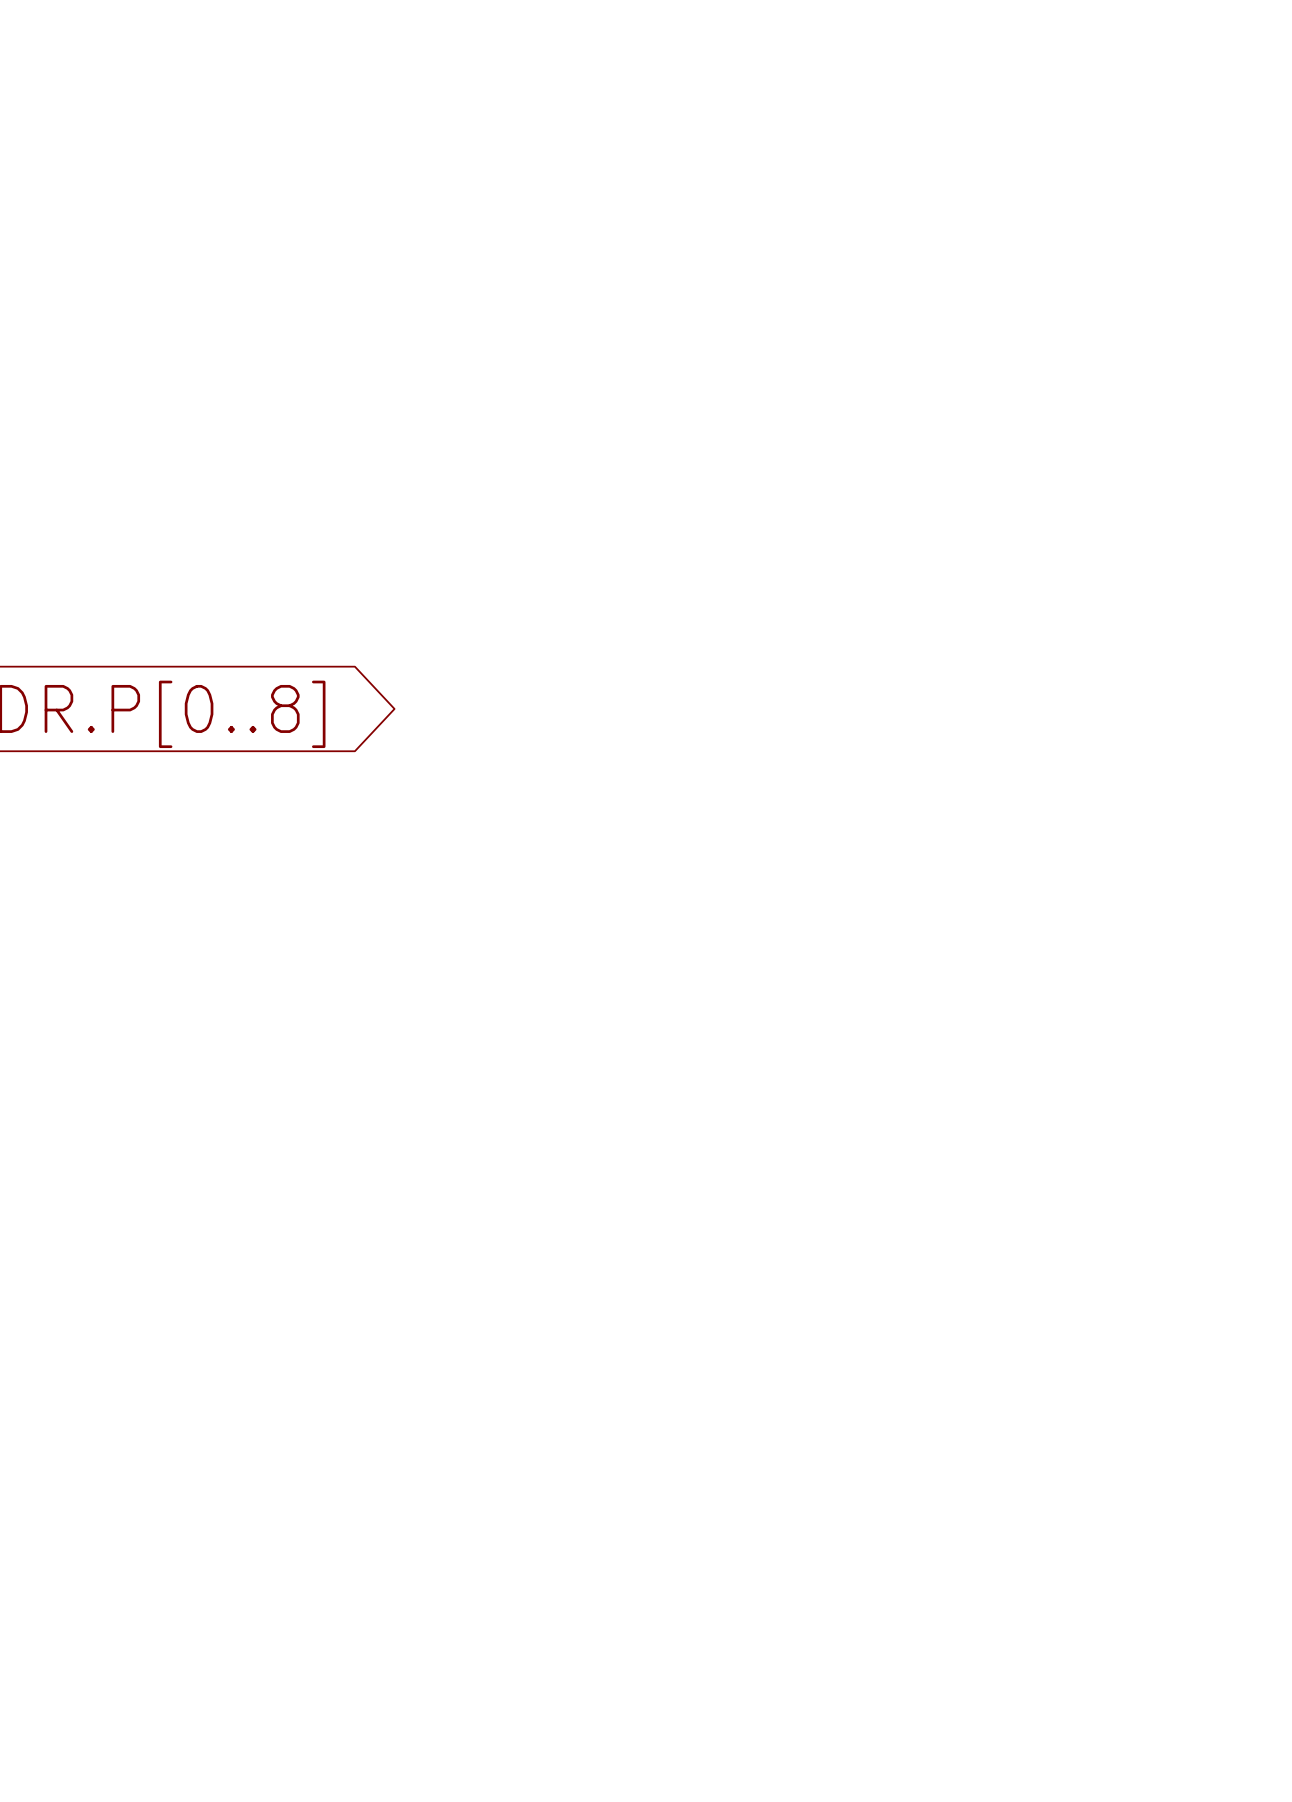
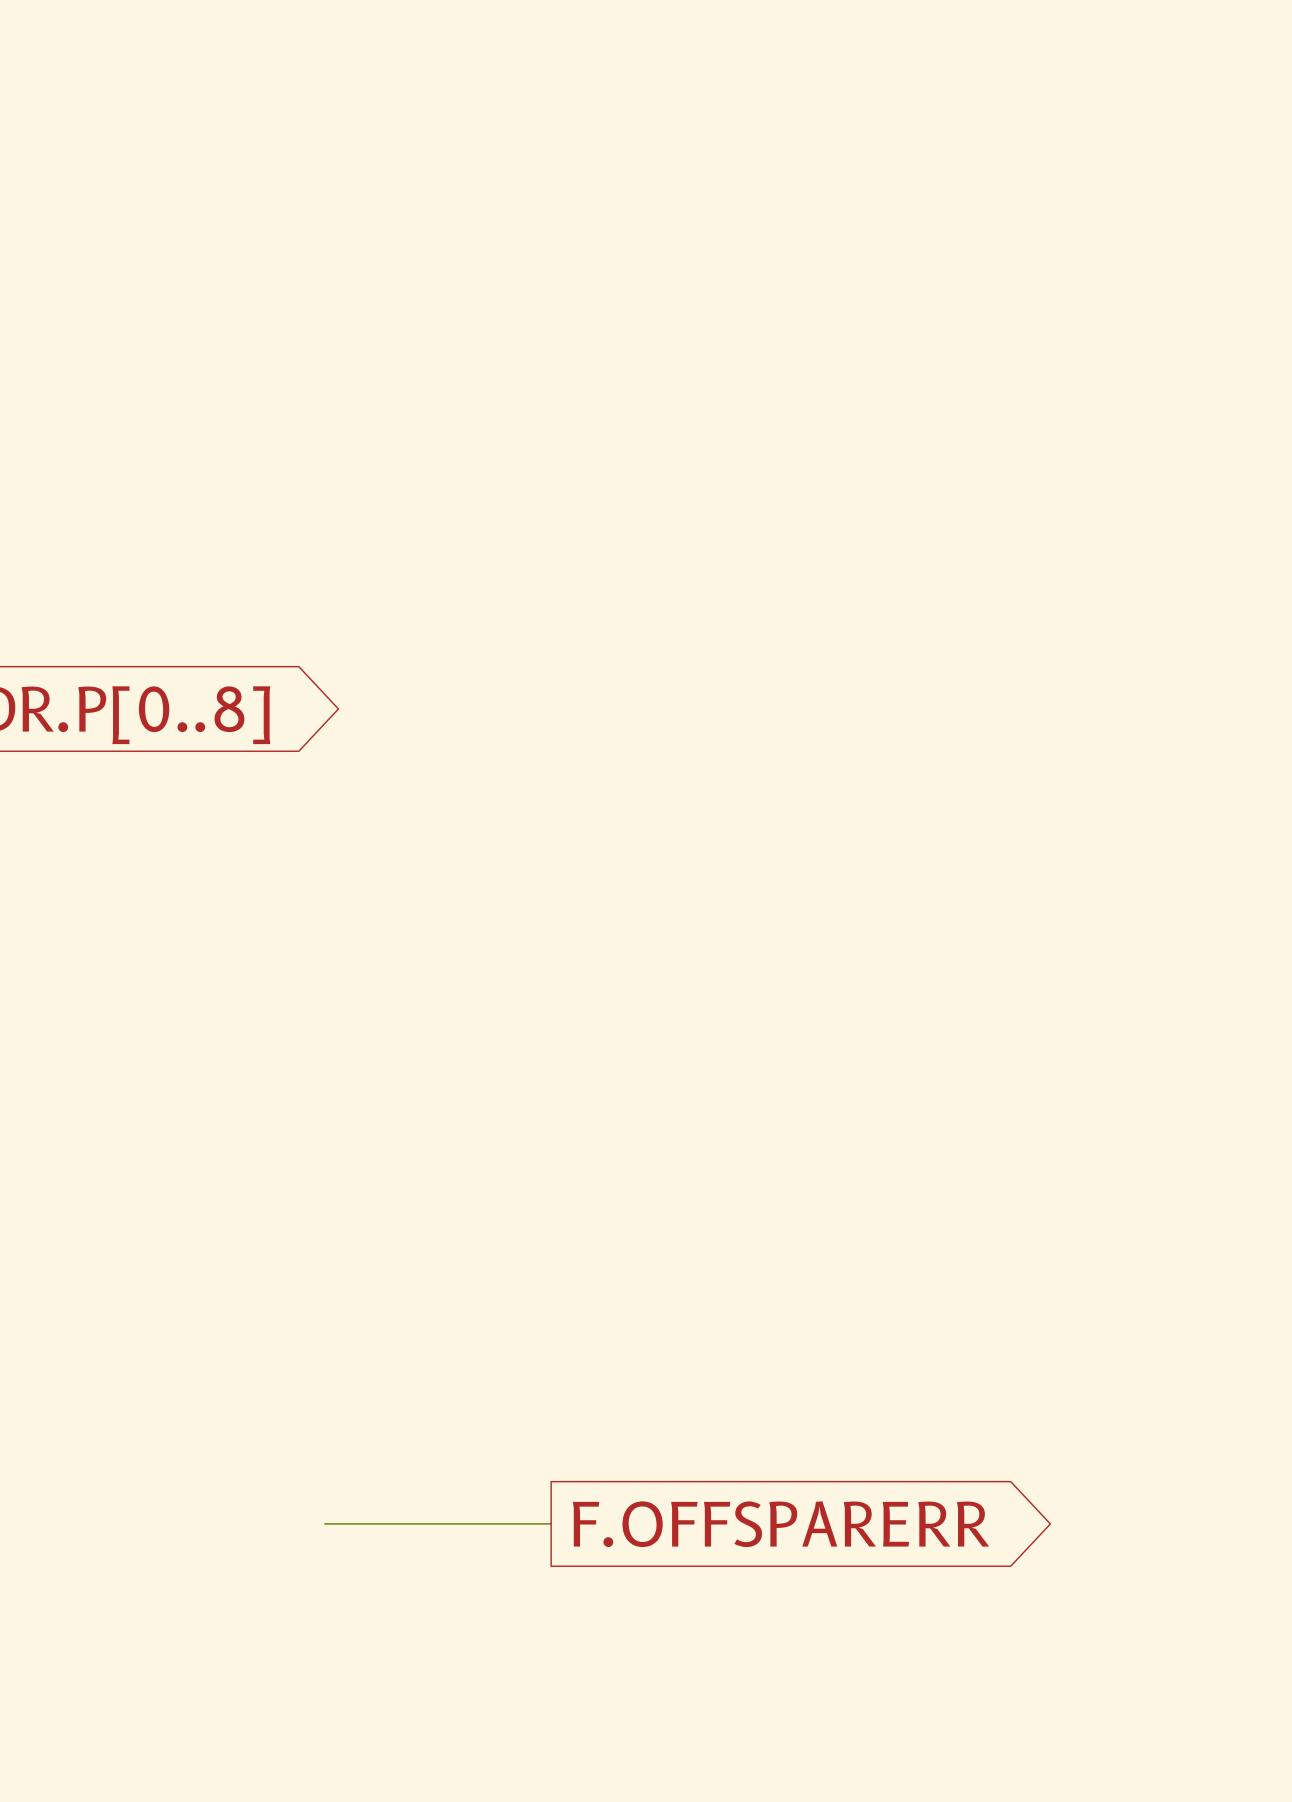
wire: none -> (324, 1523) (551, 1523)
global label: none -> F.OFFSPARERR (781, 1524)

